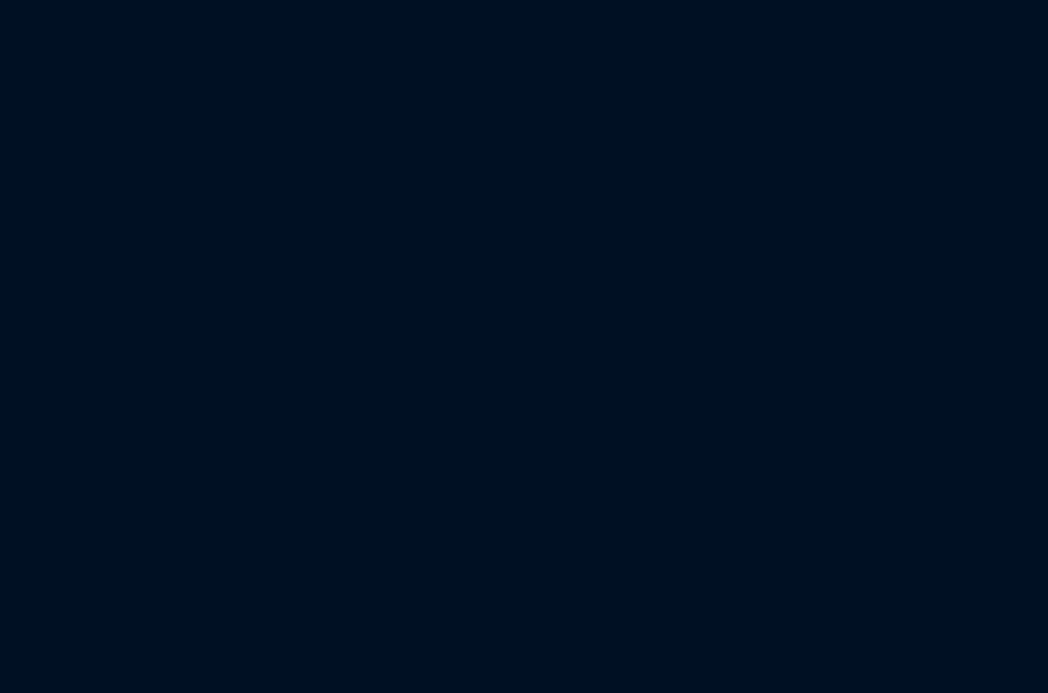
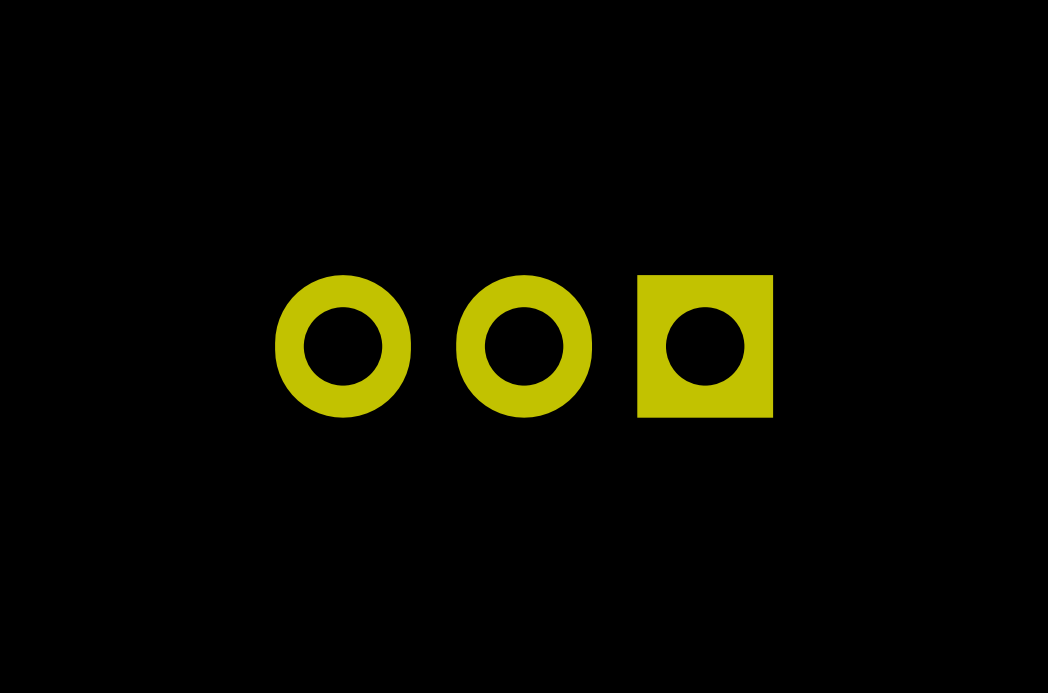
part: none -> (524, 346)

